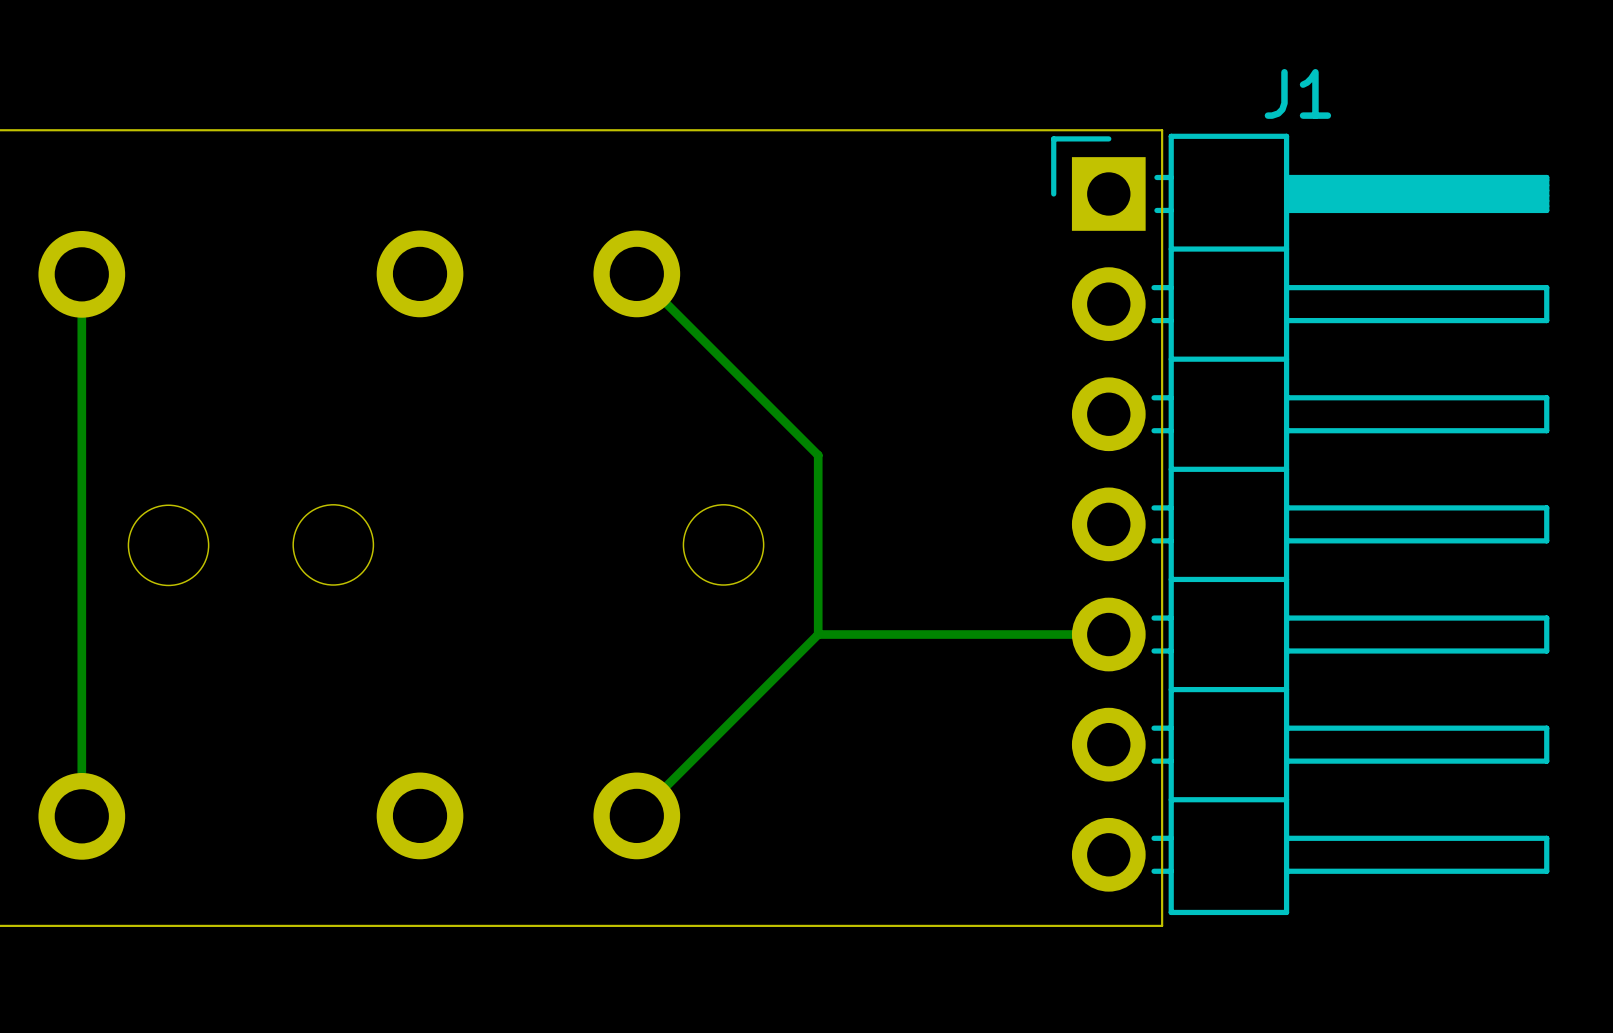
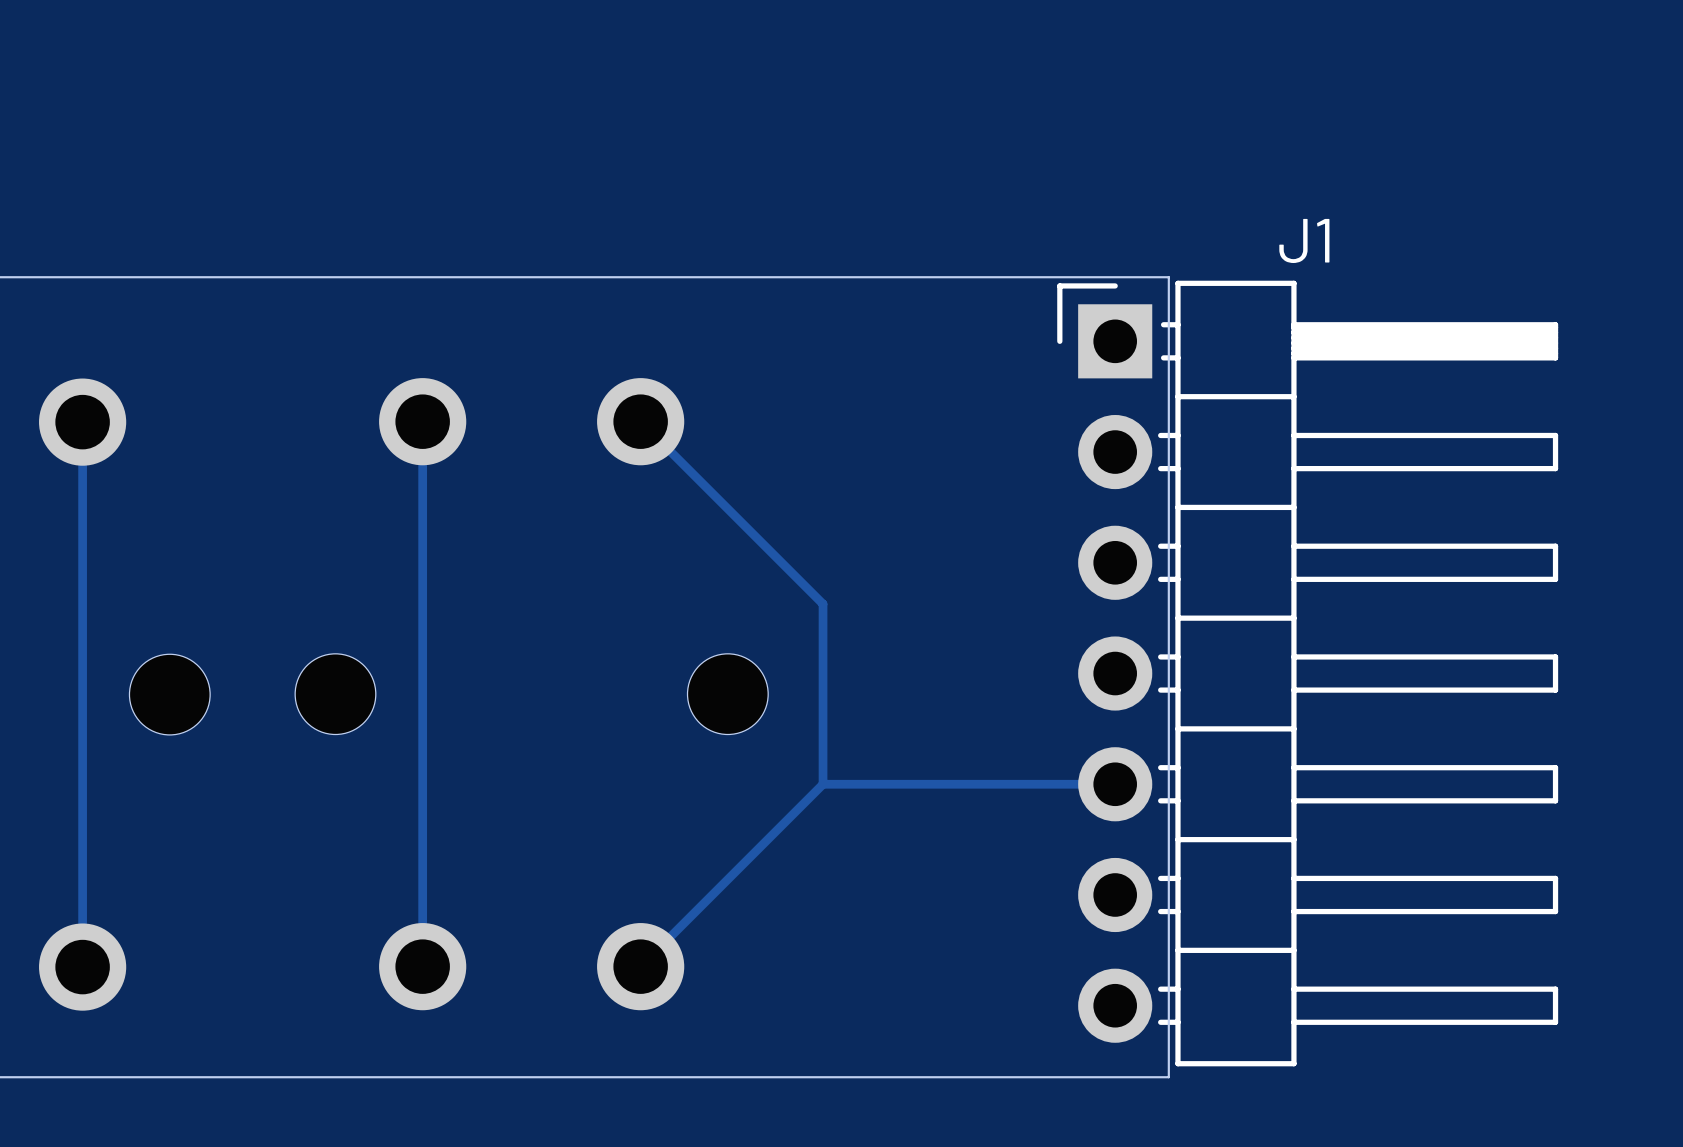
track: none -> (422, 421) (422, 966)

